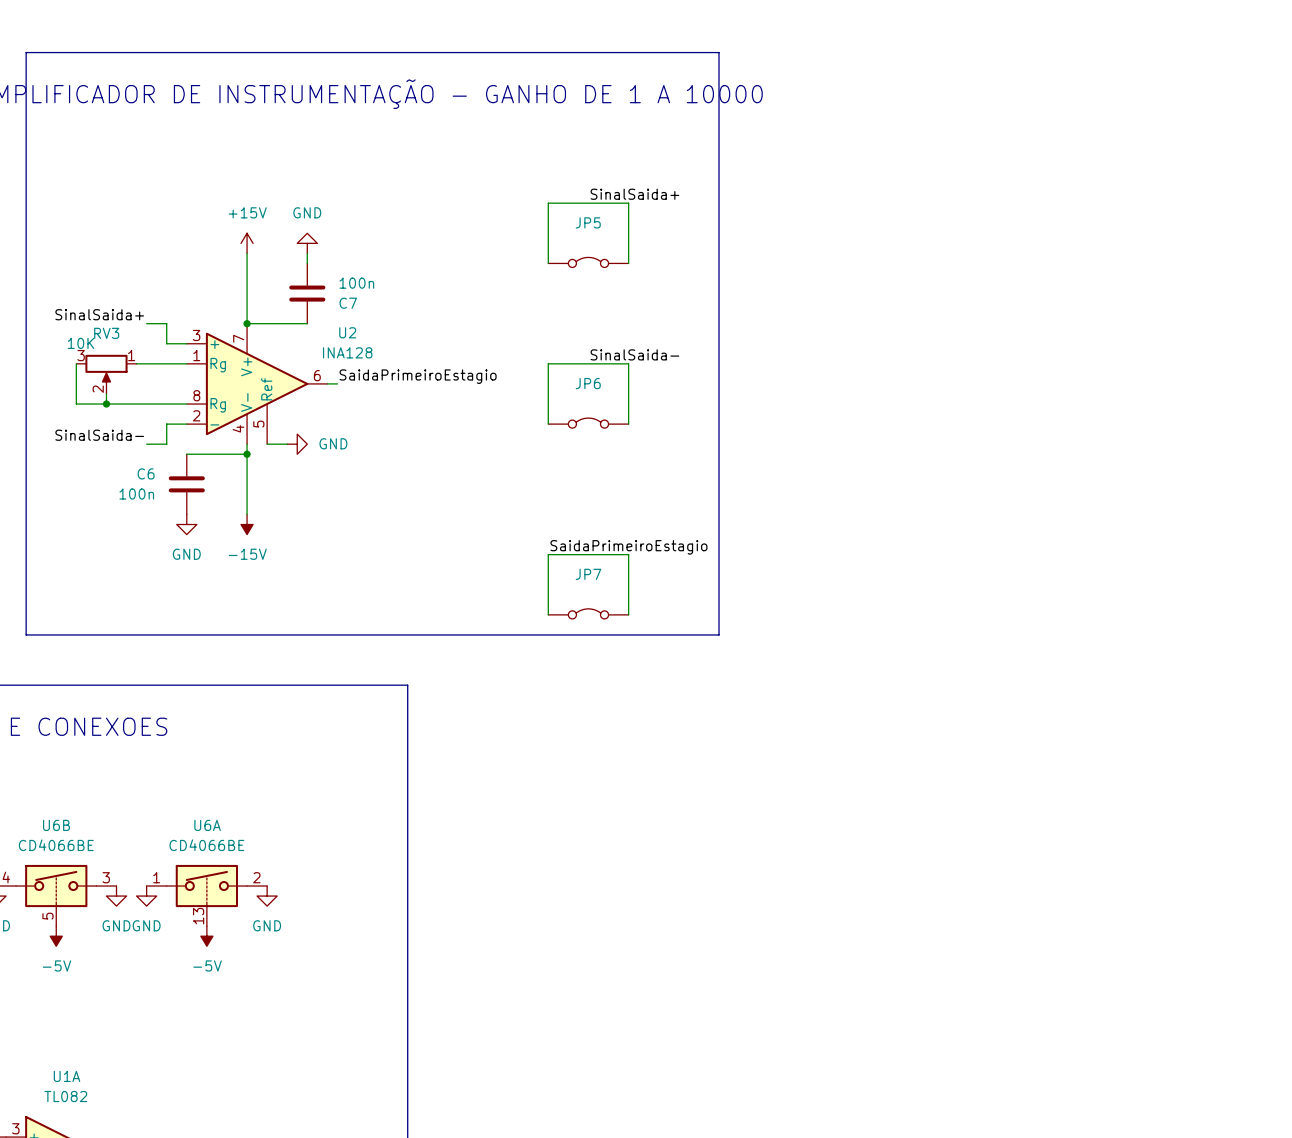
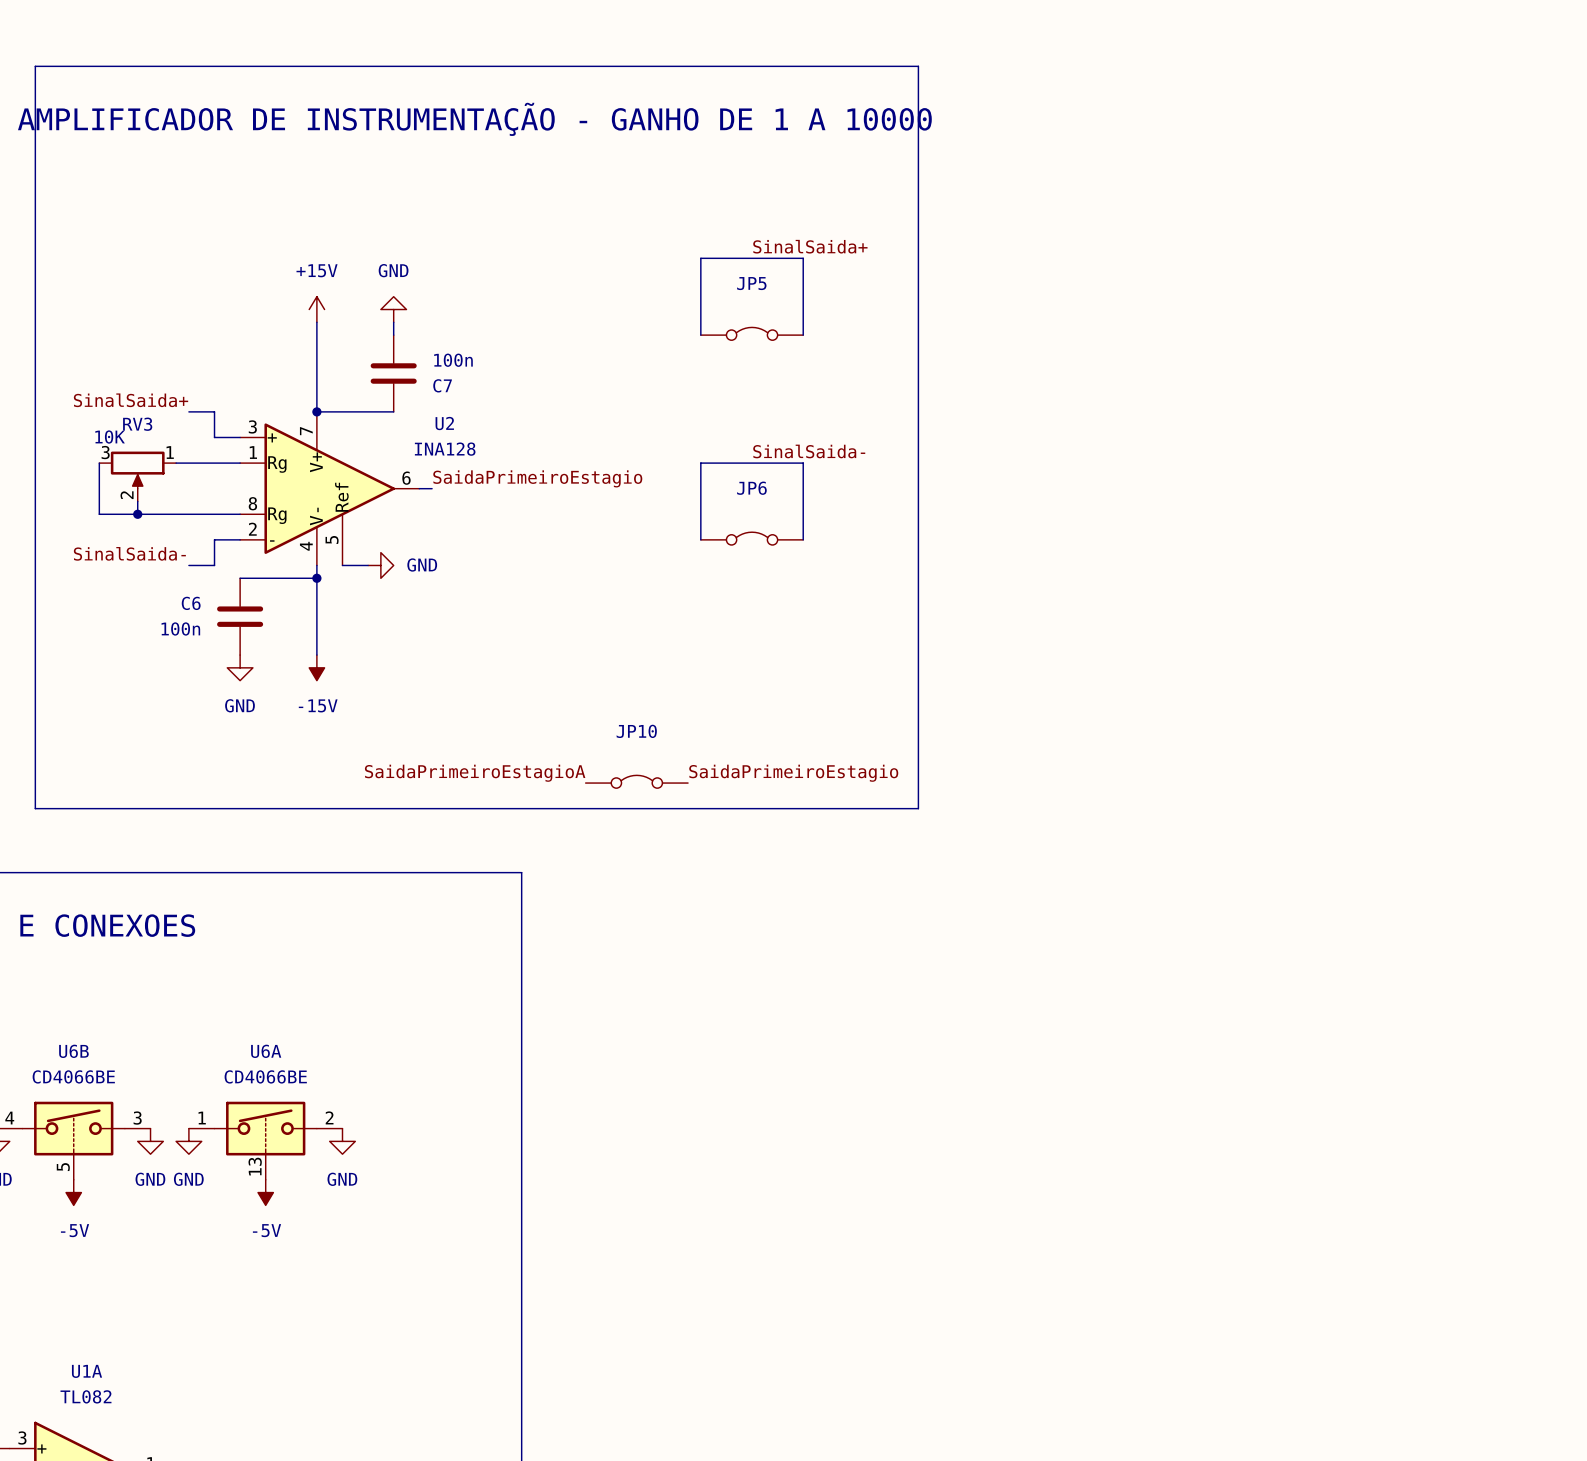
label position: SaidaPrimeiroEstagio (628, 547) -> SaidaPrimeiroEstagio (793, 773)
label: none -> SaidaPrimeiroEstagioA (475, 773)
JP10: none -> (636, 781)
JP7: (588, 613) -> none
wire: (548, 614) (548, 554) (628, 554) (628, 614) -> none

